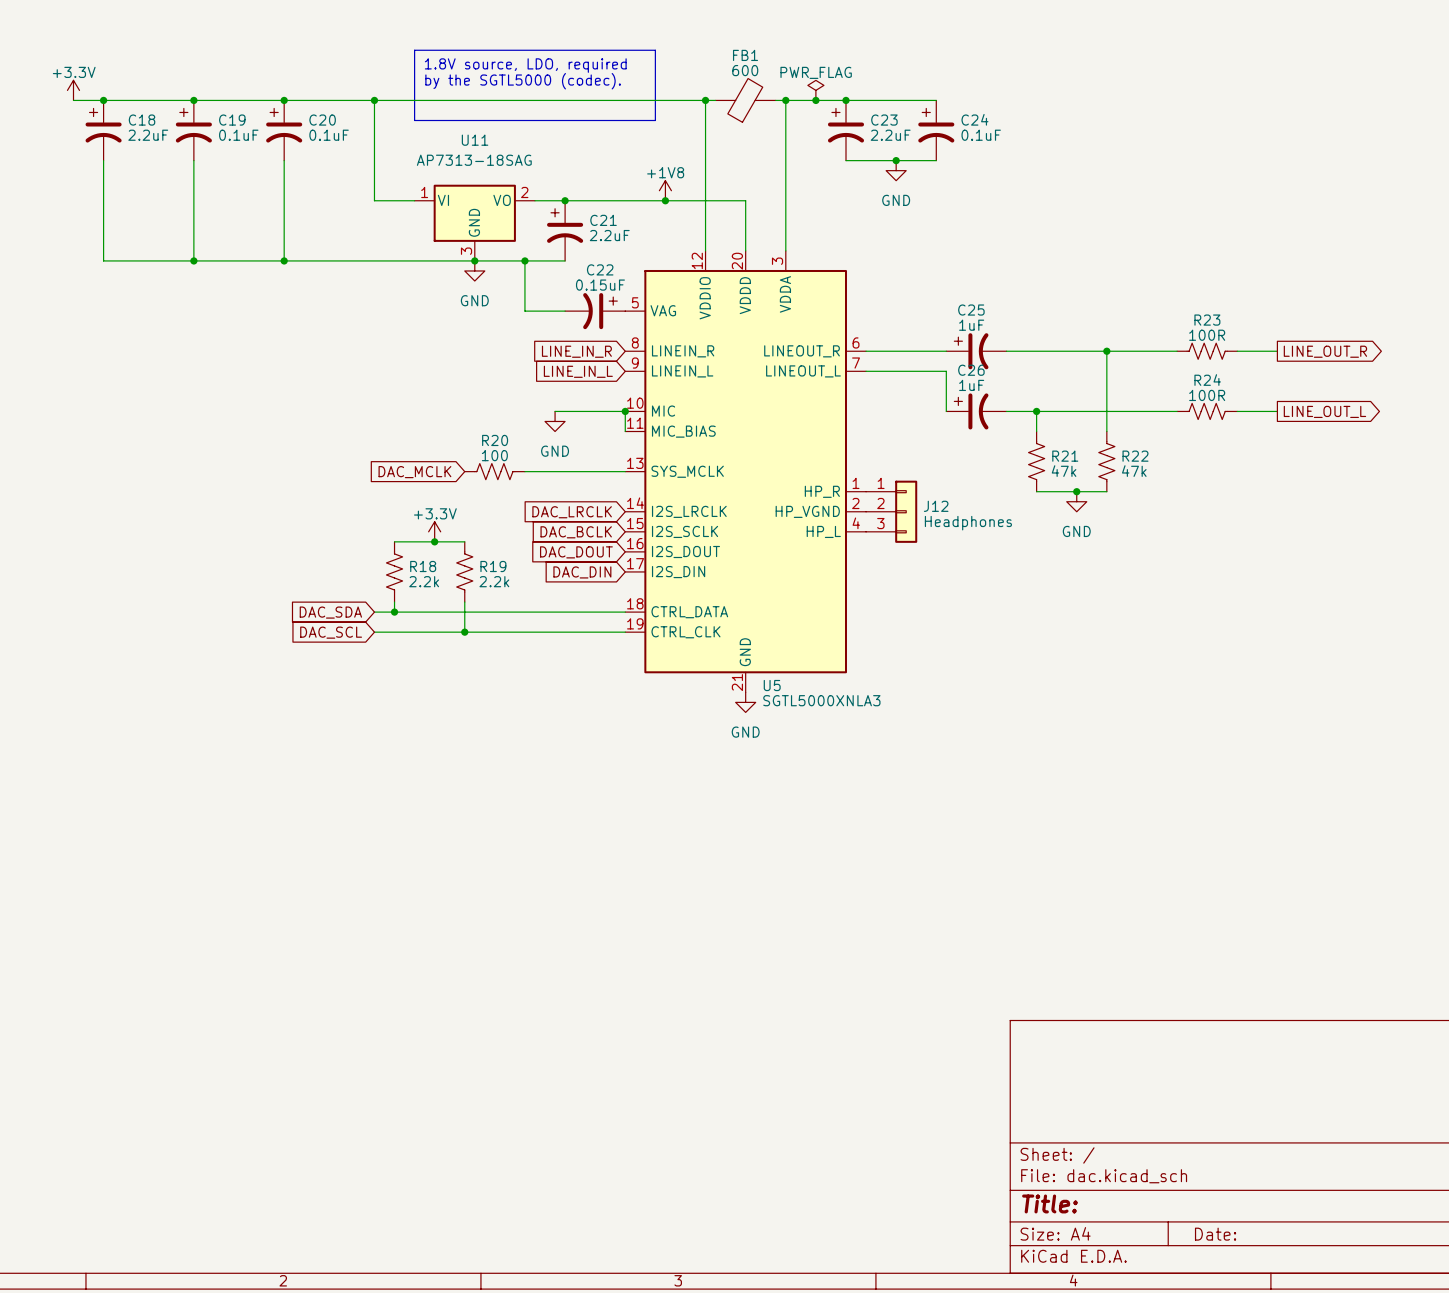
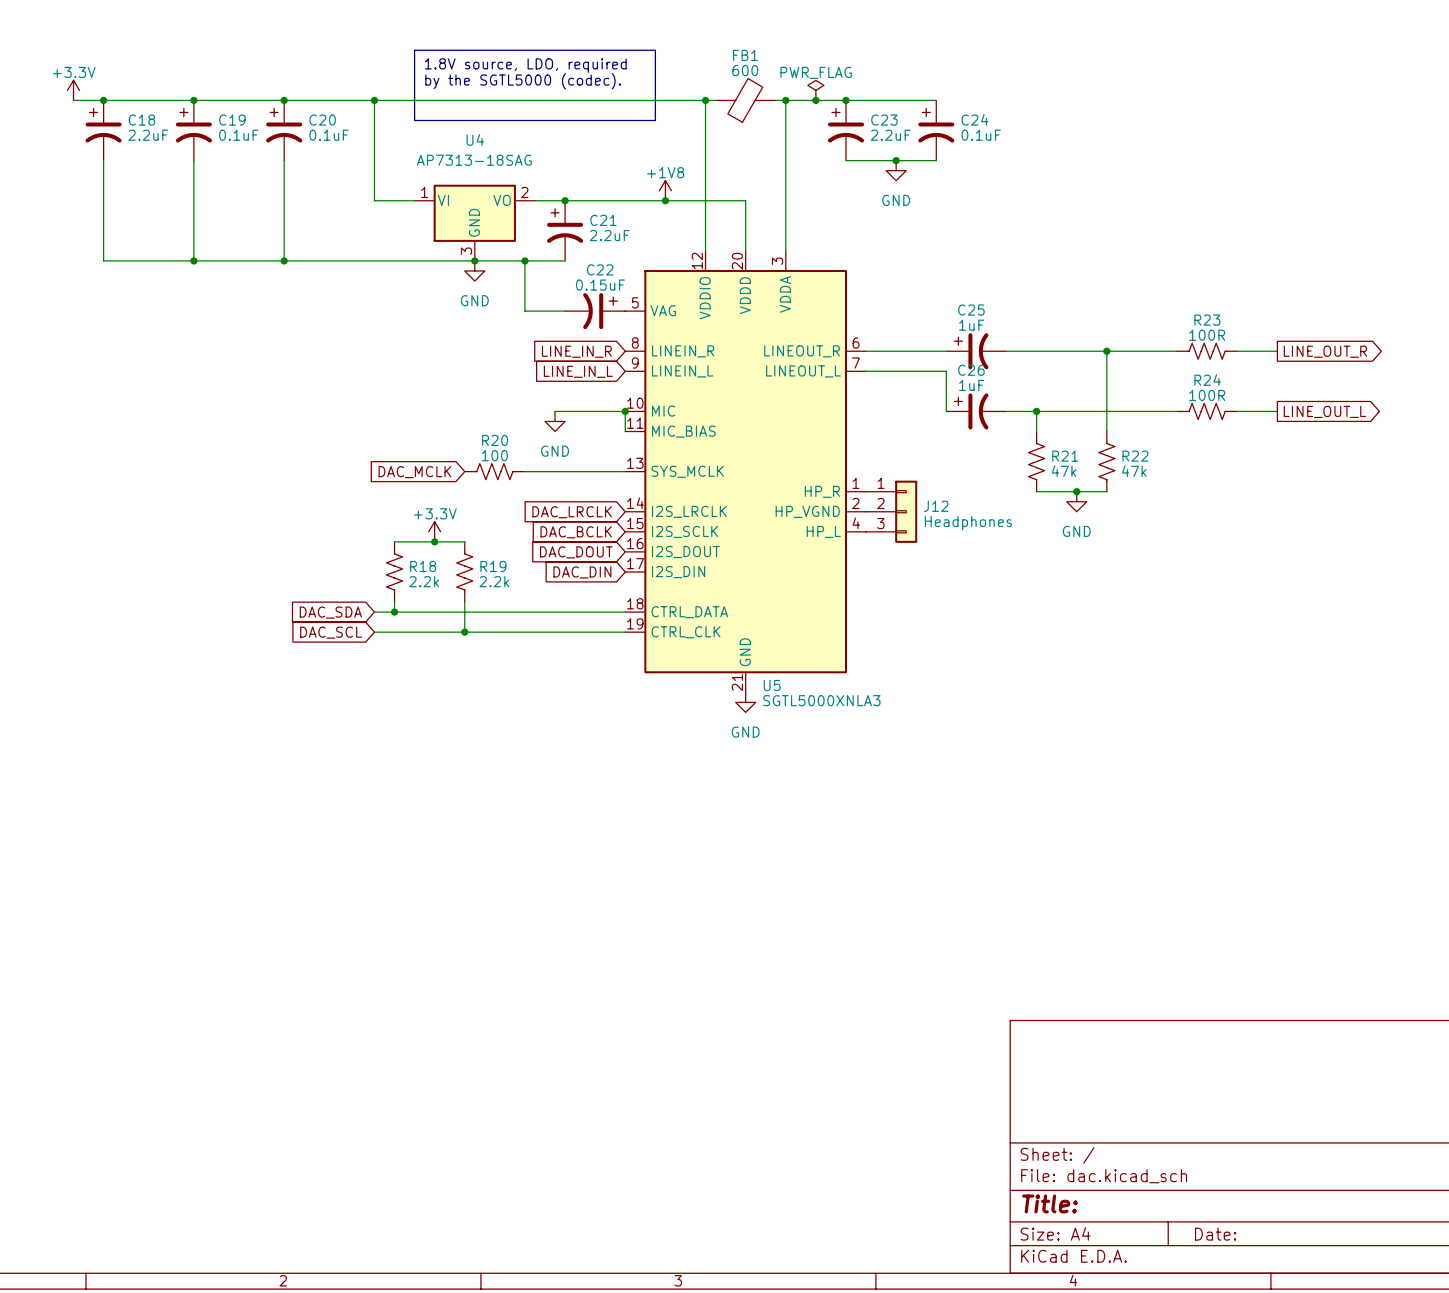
U11 name: U11 (475, 140) -> U4 (475, 139)

